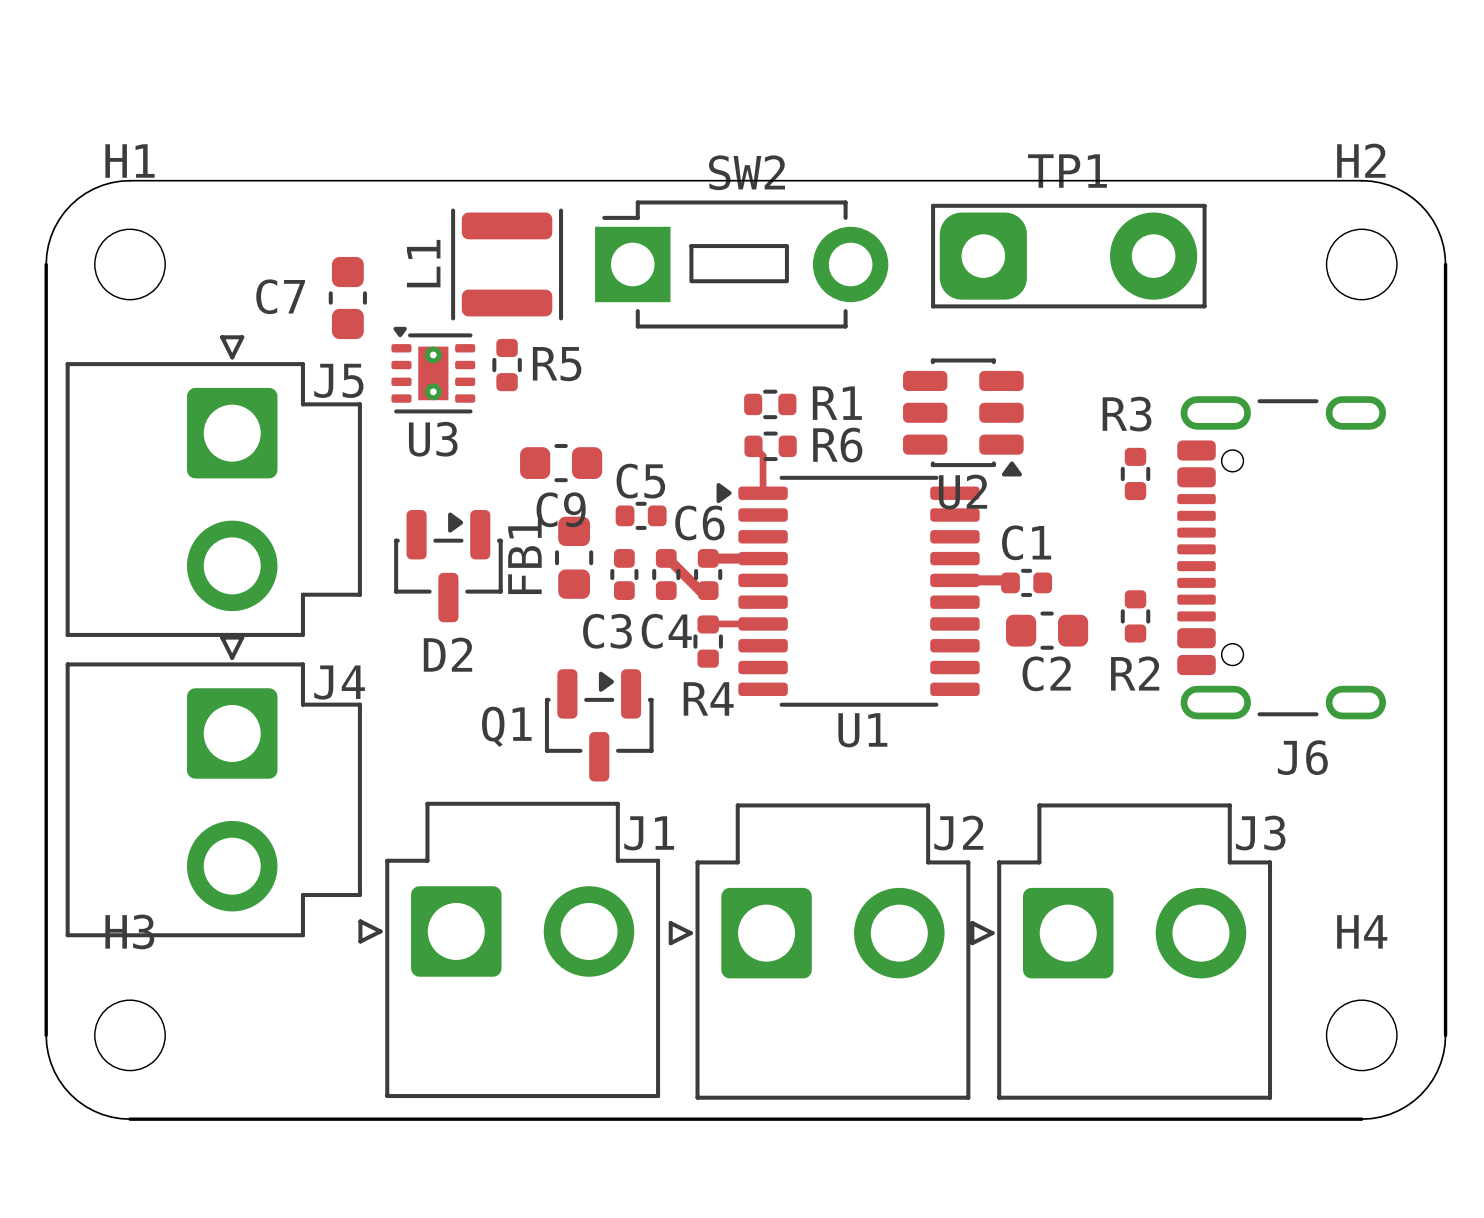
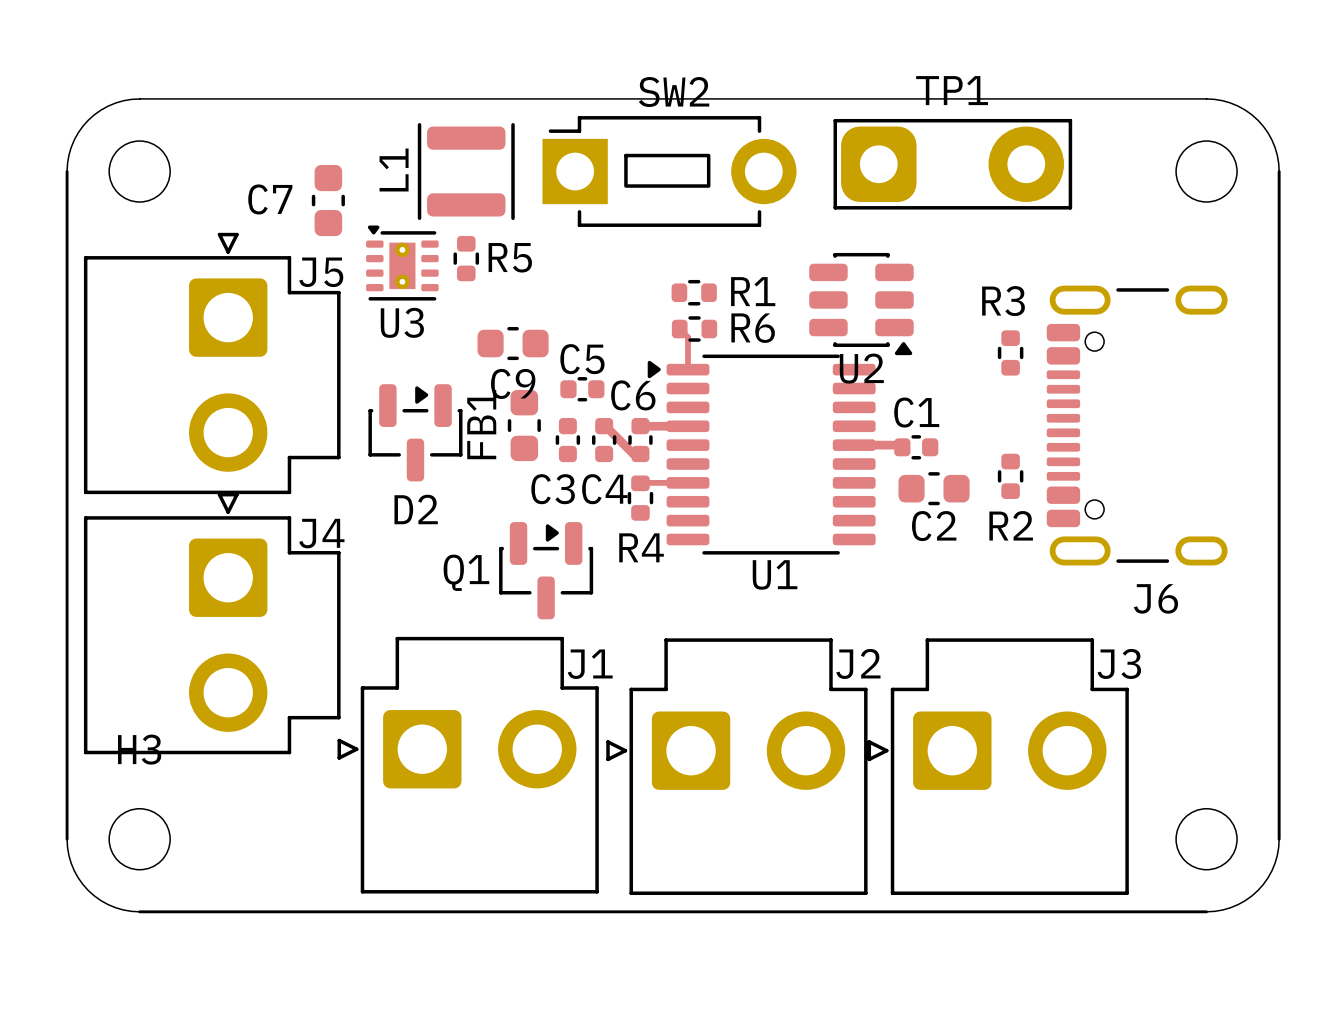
H2 name: H2 (1361, 160) -> none
H1 name: H1 (129, 161) -> none
H4 name: H4 (1362, 931) -> none

